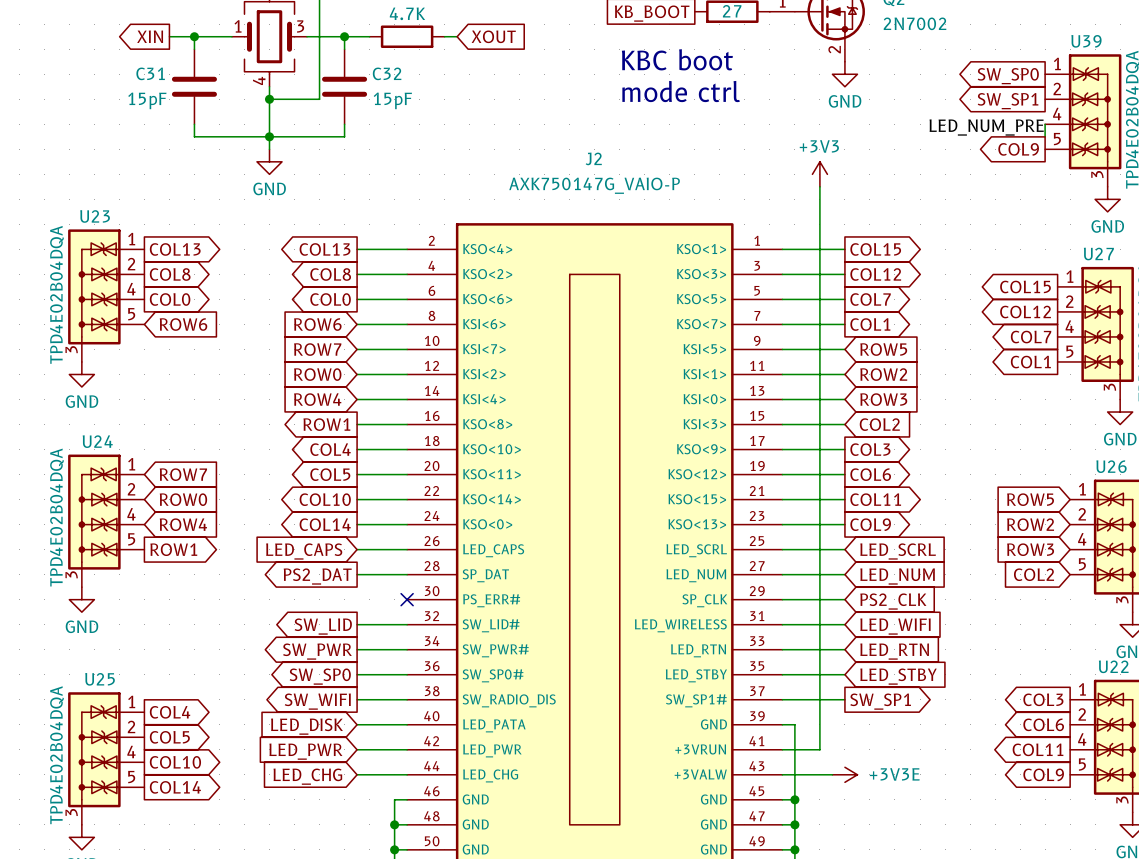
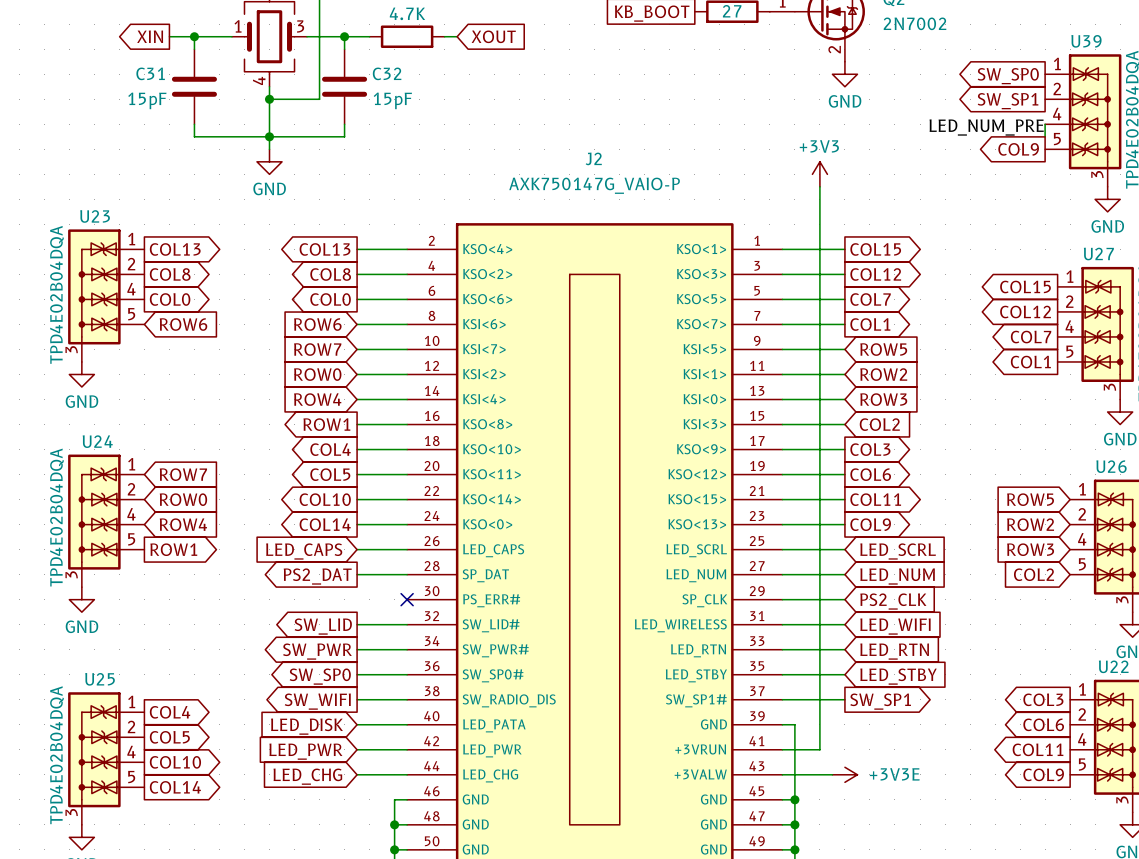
text: KBC boot (677, 59) -> none
text: mode ctrl (681, 91) -> none

